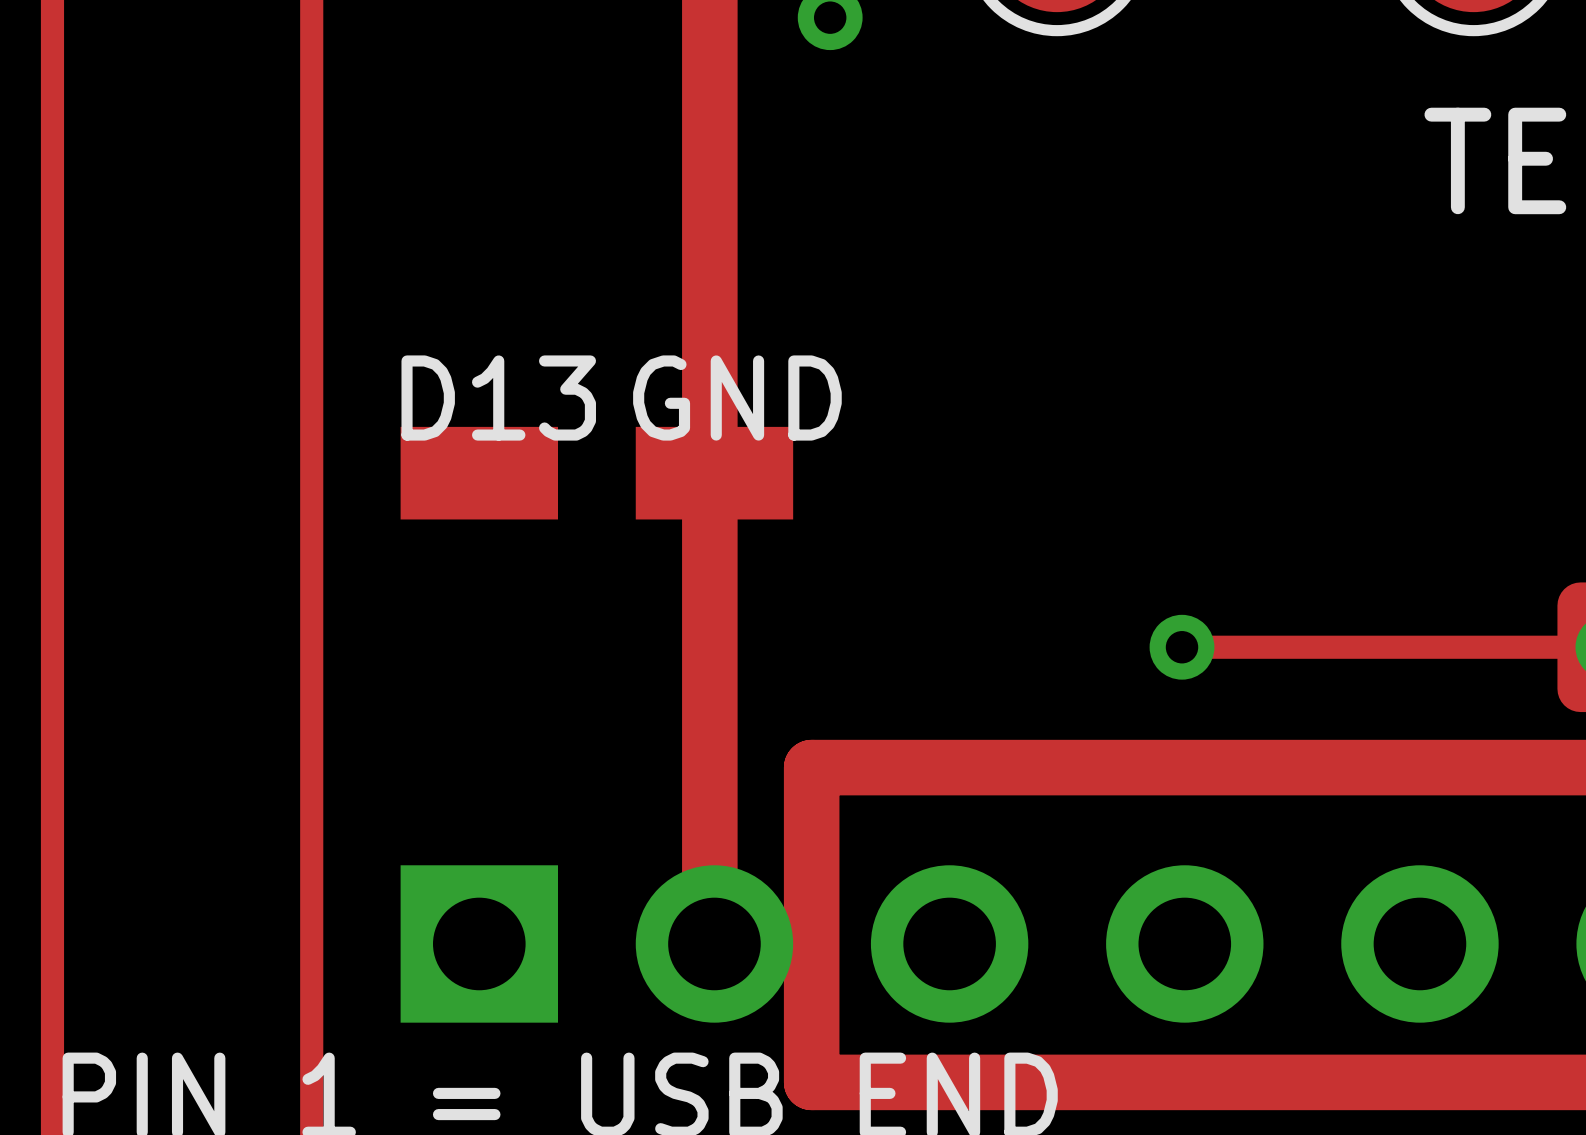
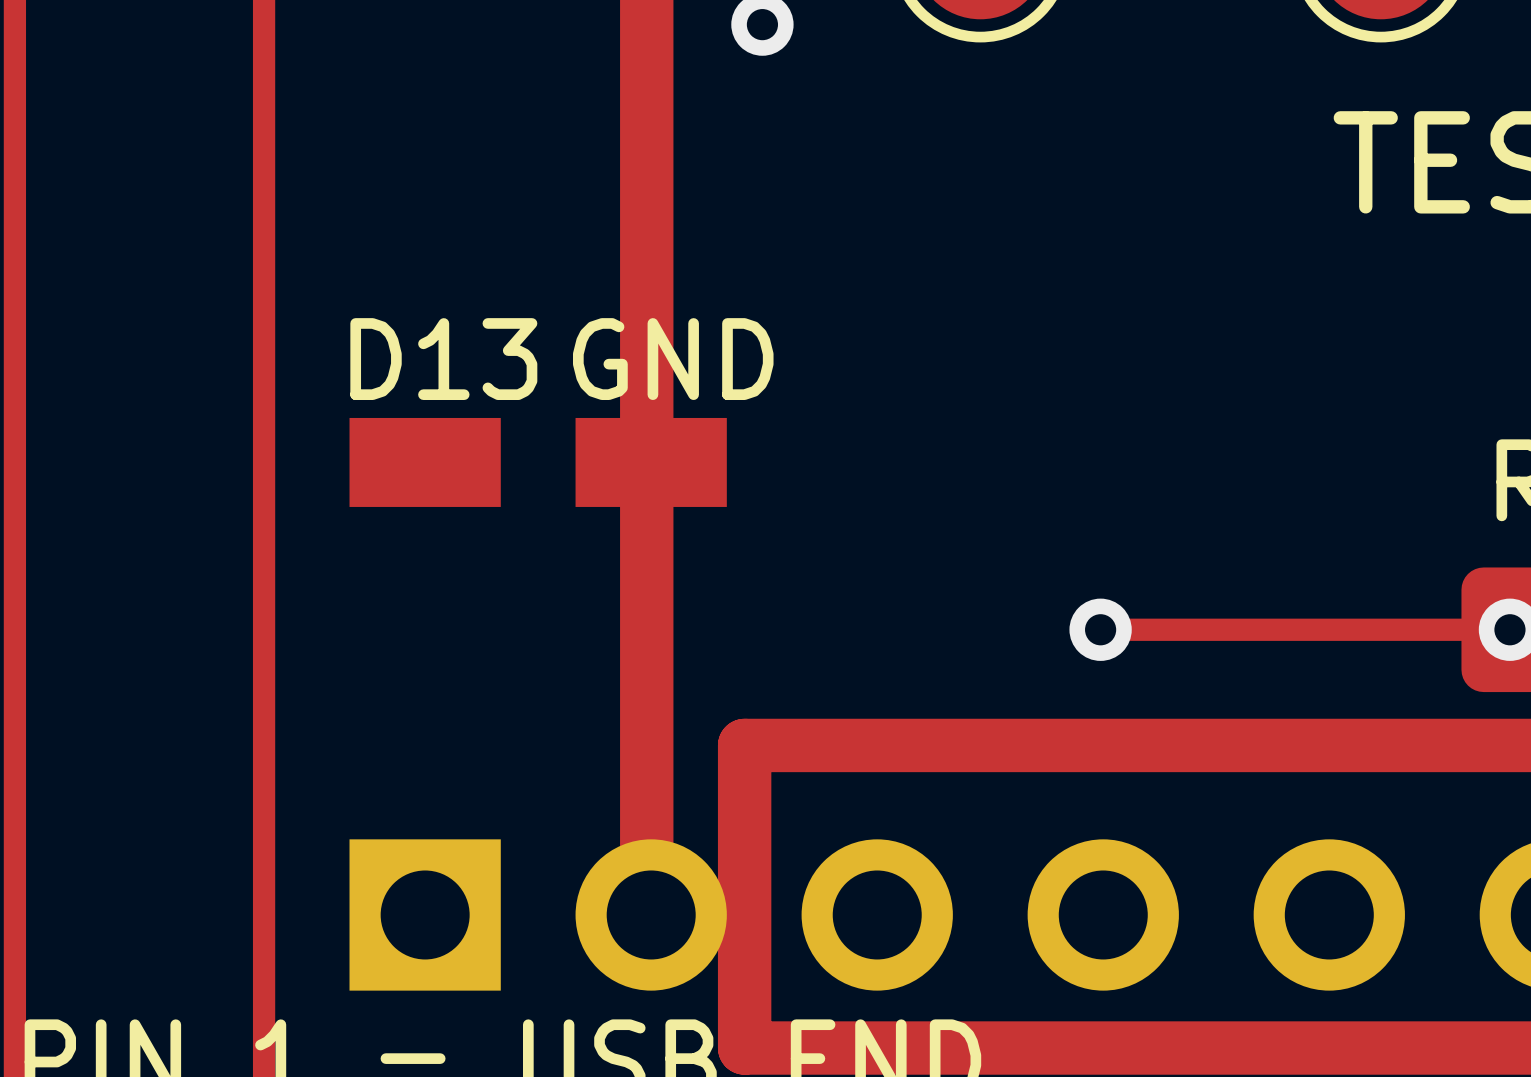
text position: D13 (498, 398) -> D13 (443, 359)
text position: GND (737, 398) -> GND (673, 359)

